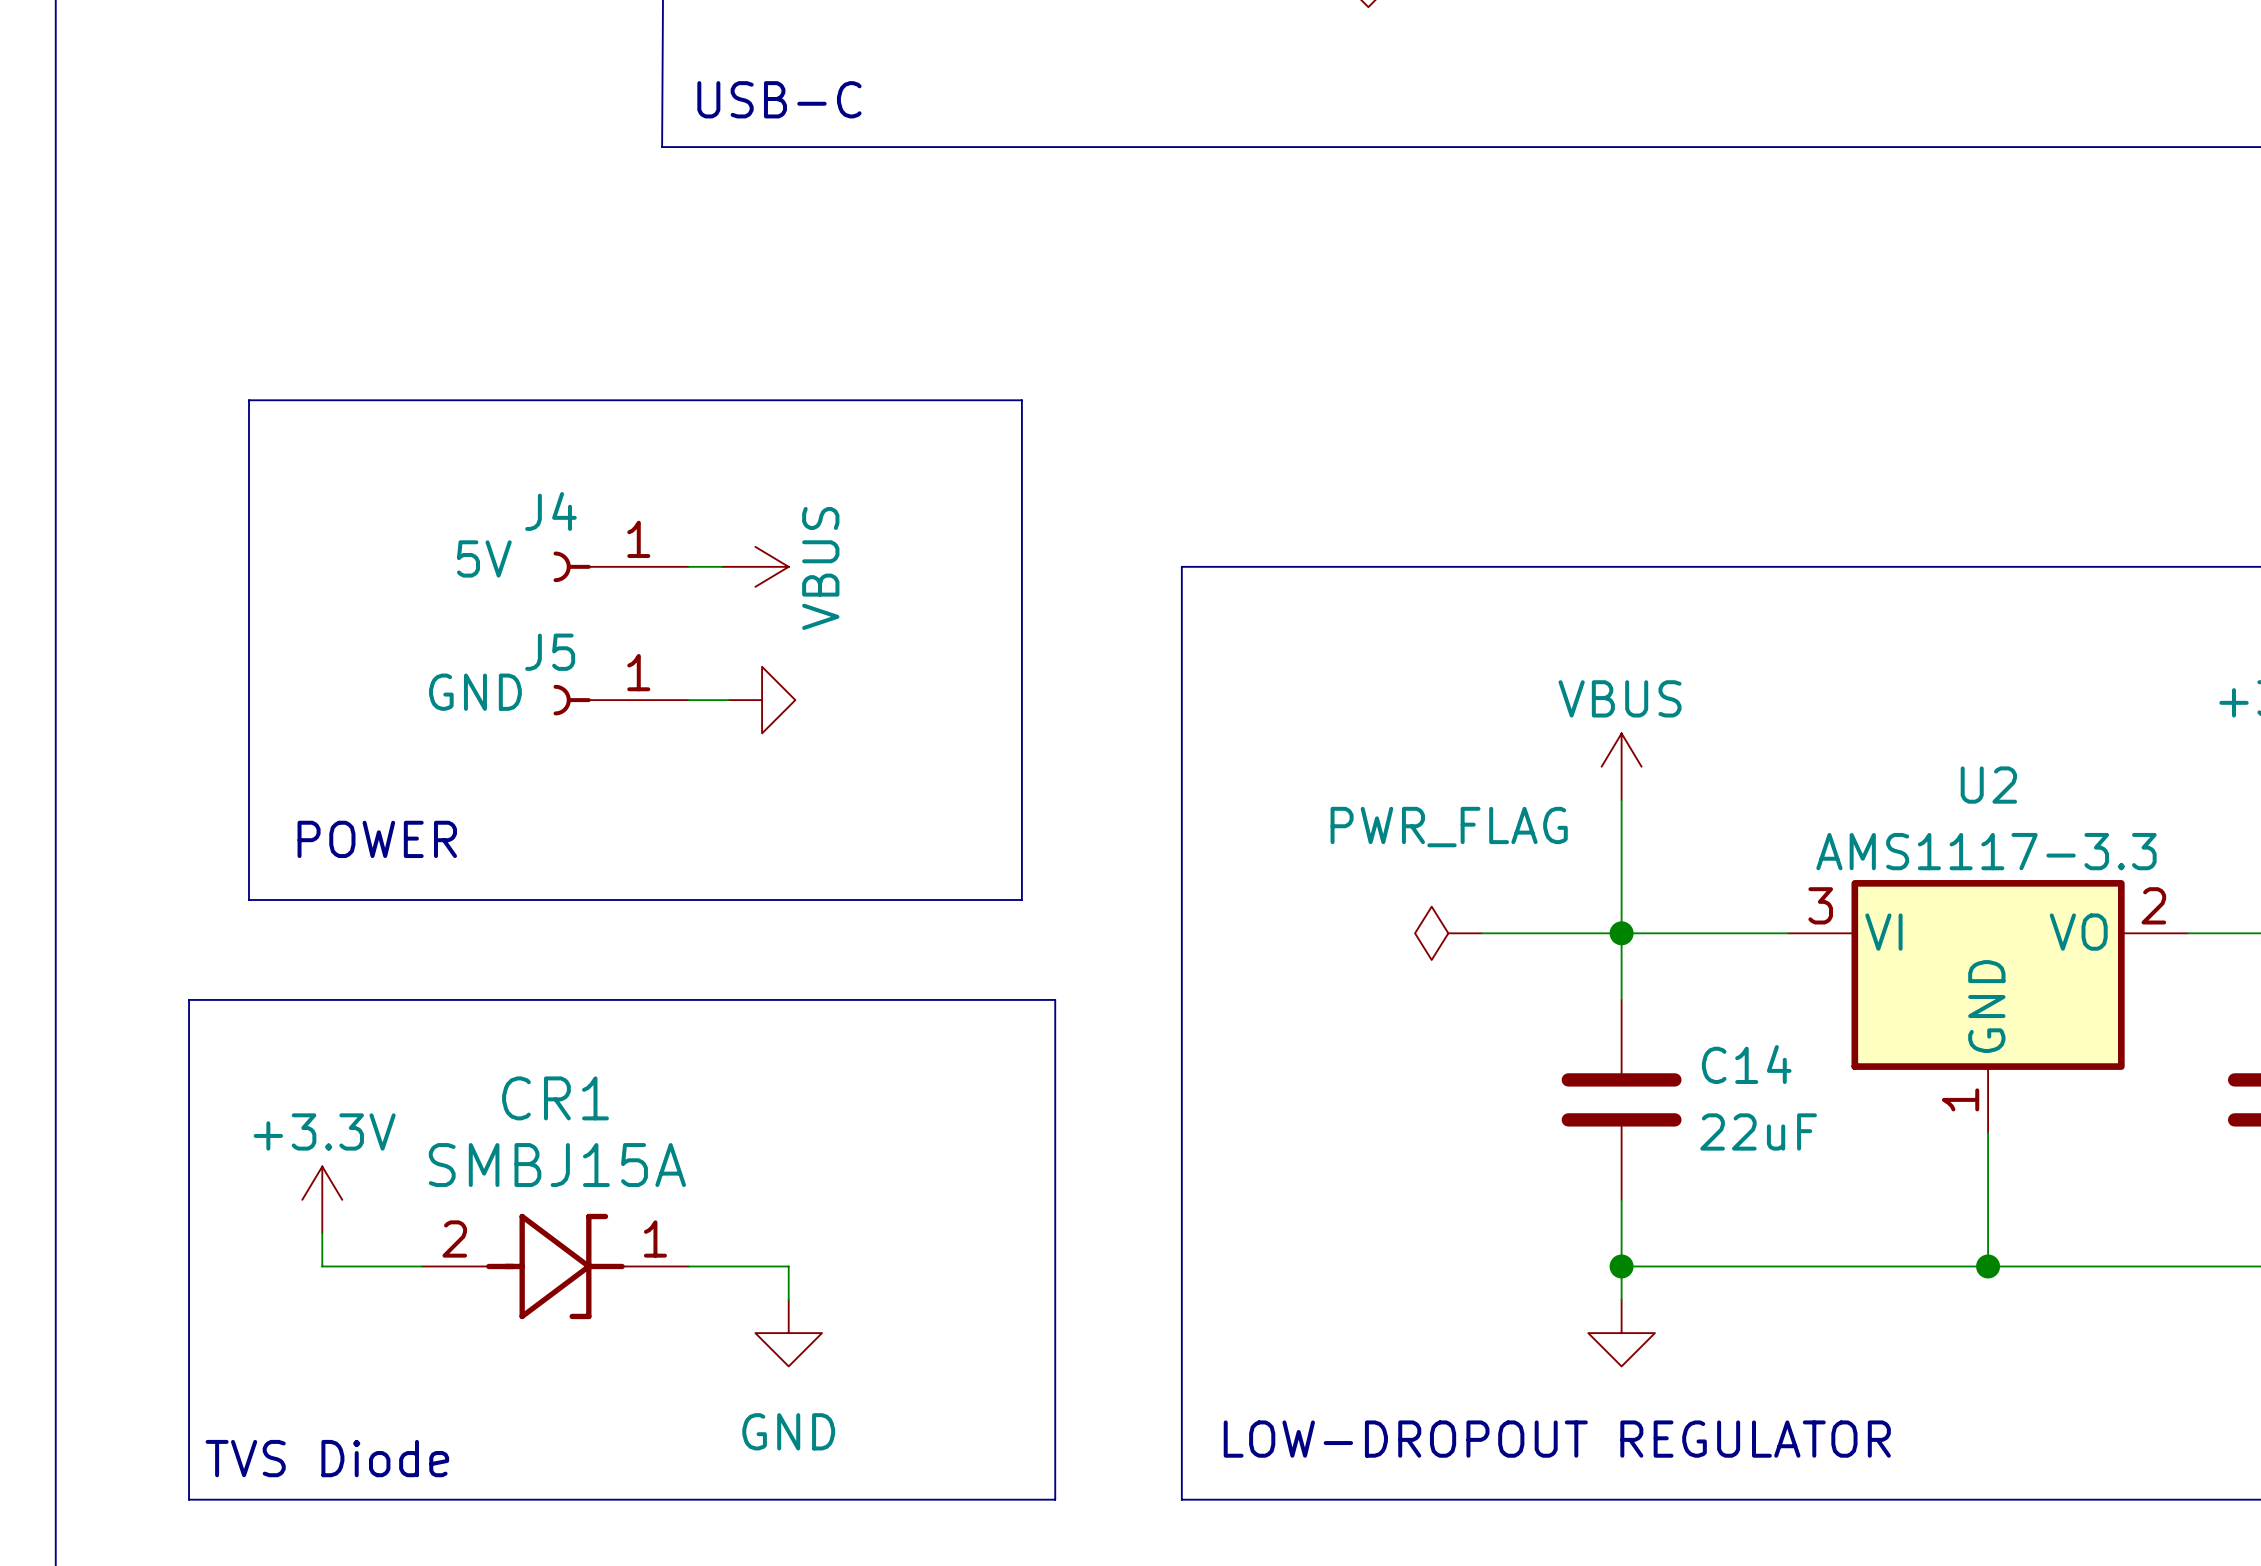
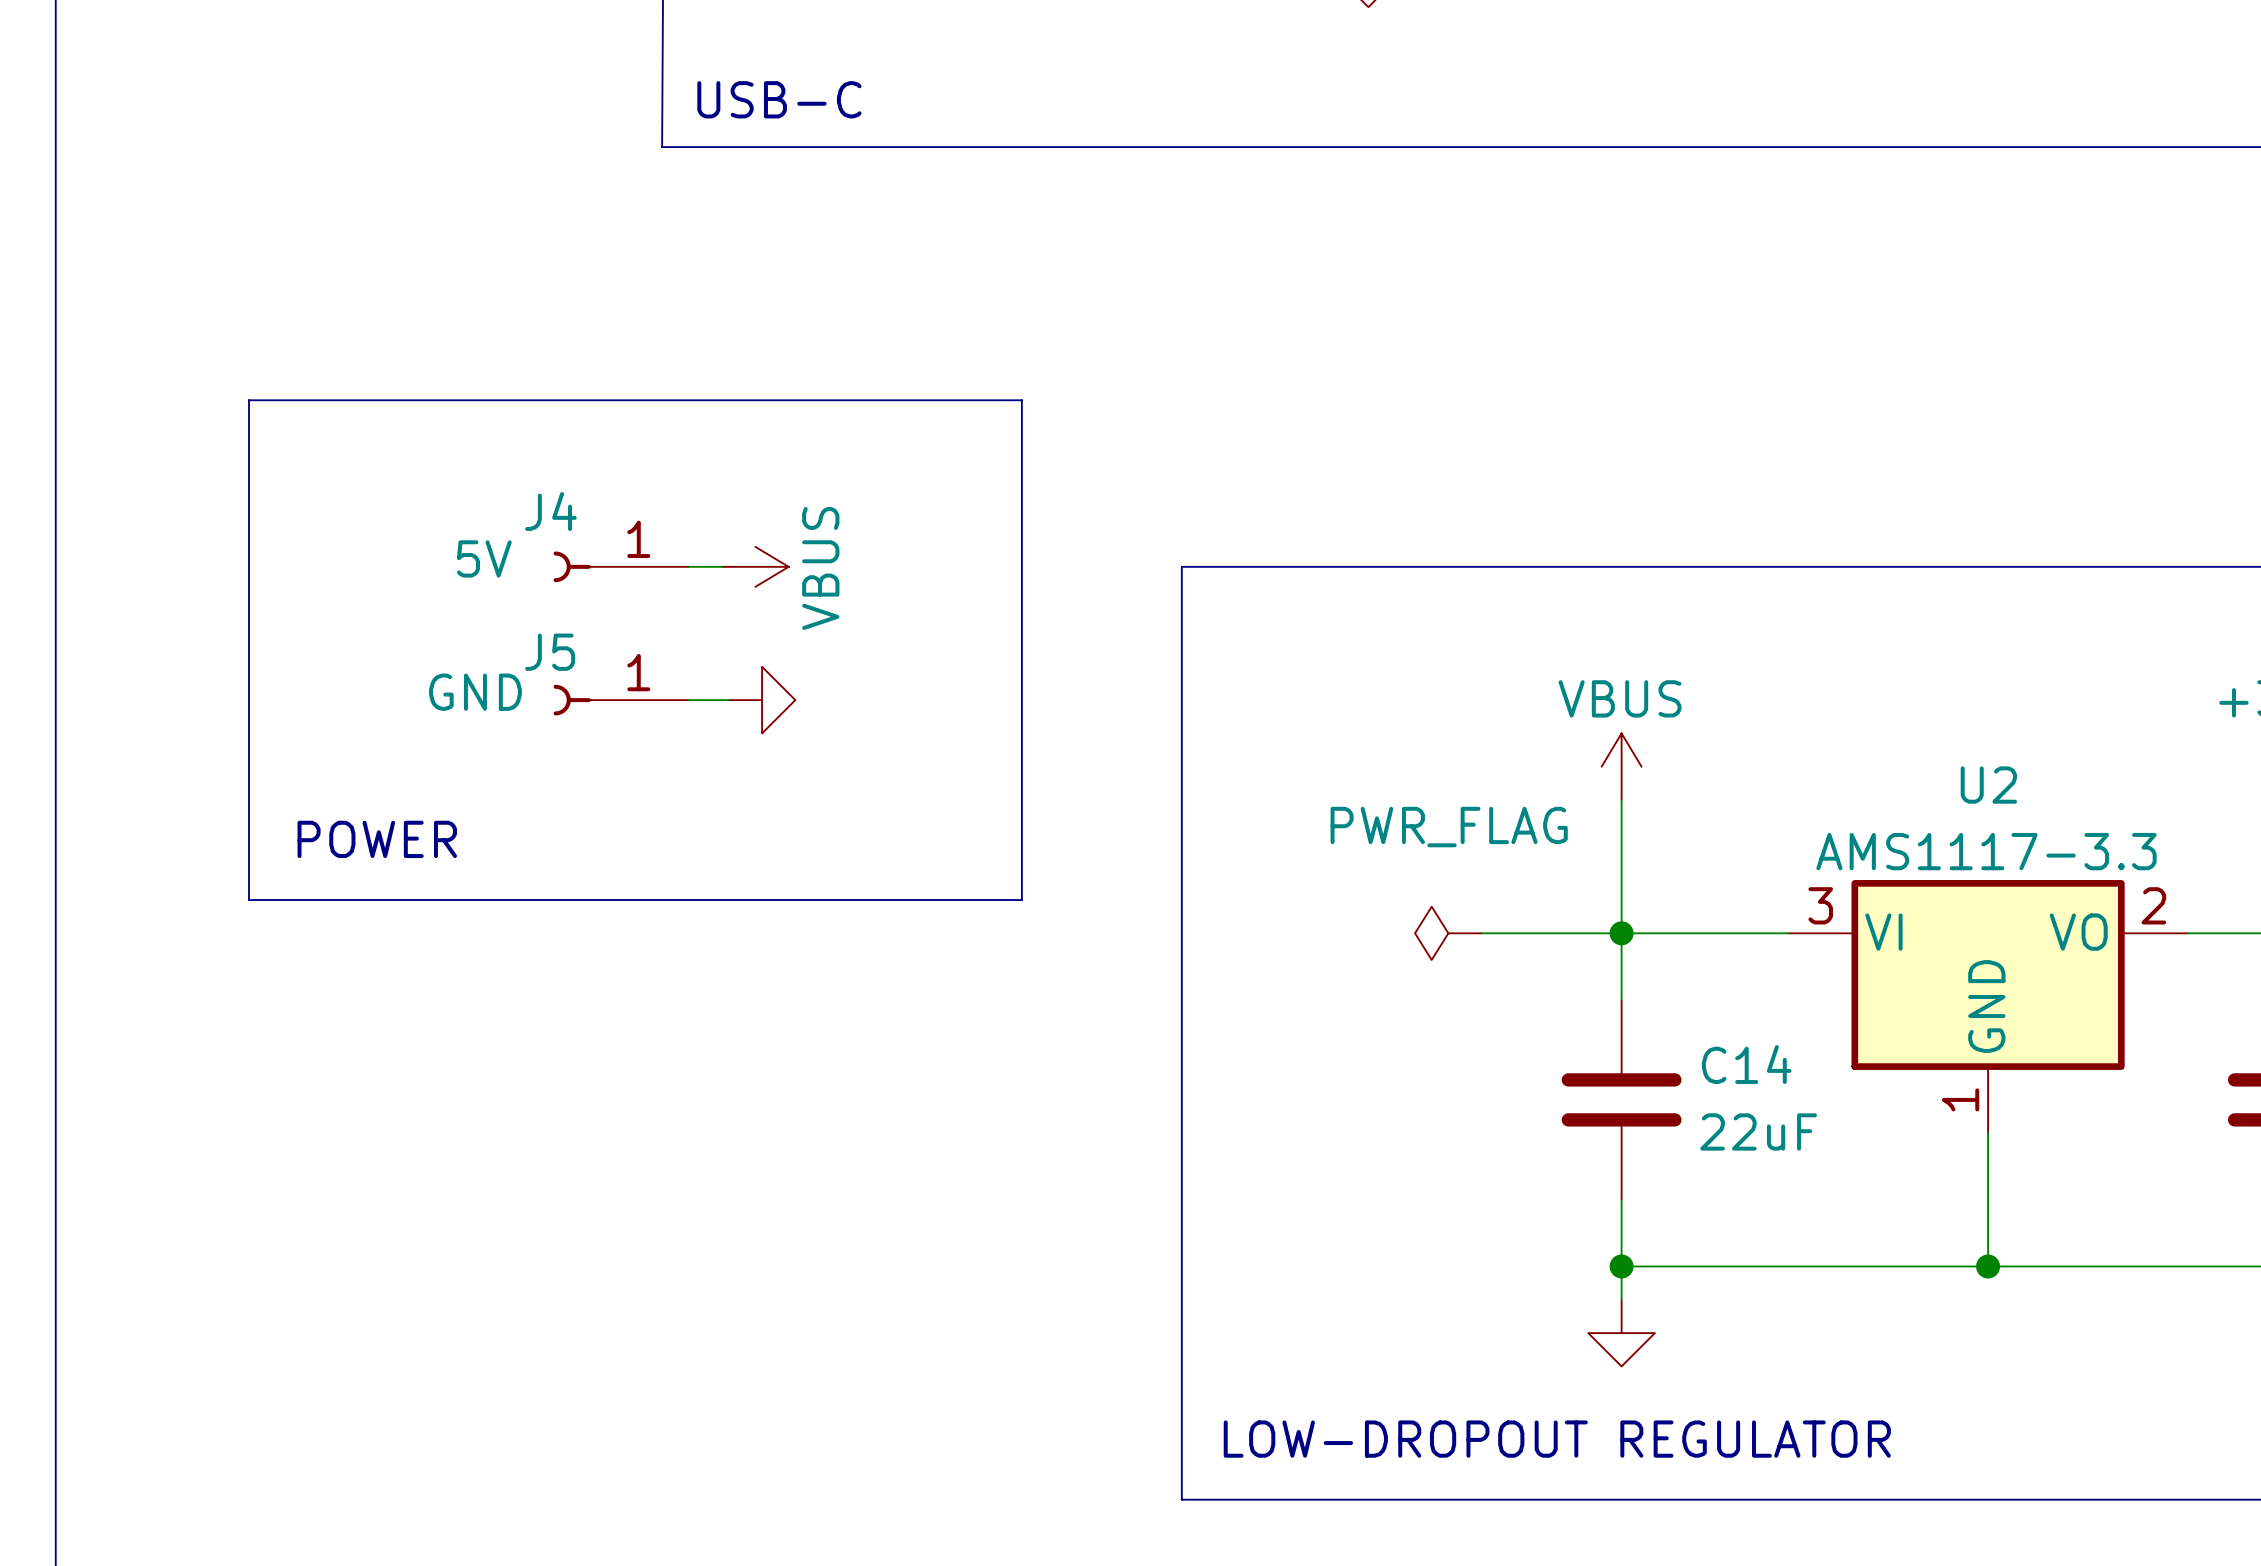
line: (189, 999) (1055, 999) (1055, 1499) (189, 1499) (189, 999) -> none
power symbol: +3.3V (322, 1199) -> none
wire: (322, 1233) (322, 1266) (422, 1266) -> none
CR1: SMBJ15A (555, 1266) -> none
wire: (688, 1266) (788, 1266) (788, 1299) -> none
power symbol: GND (788, 1333) -> none
text: TVS Diode (327, 1458) -> none

